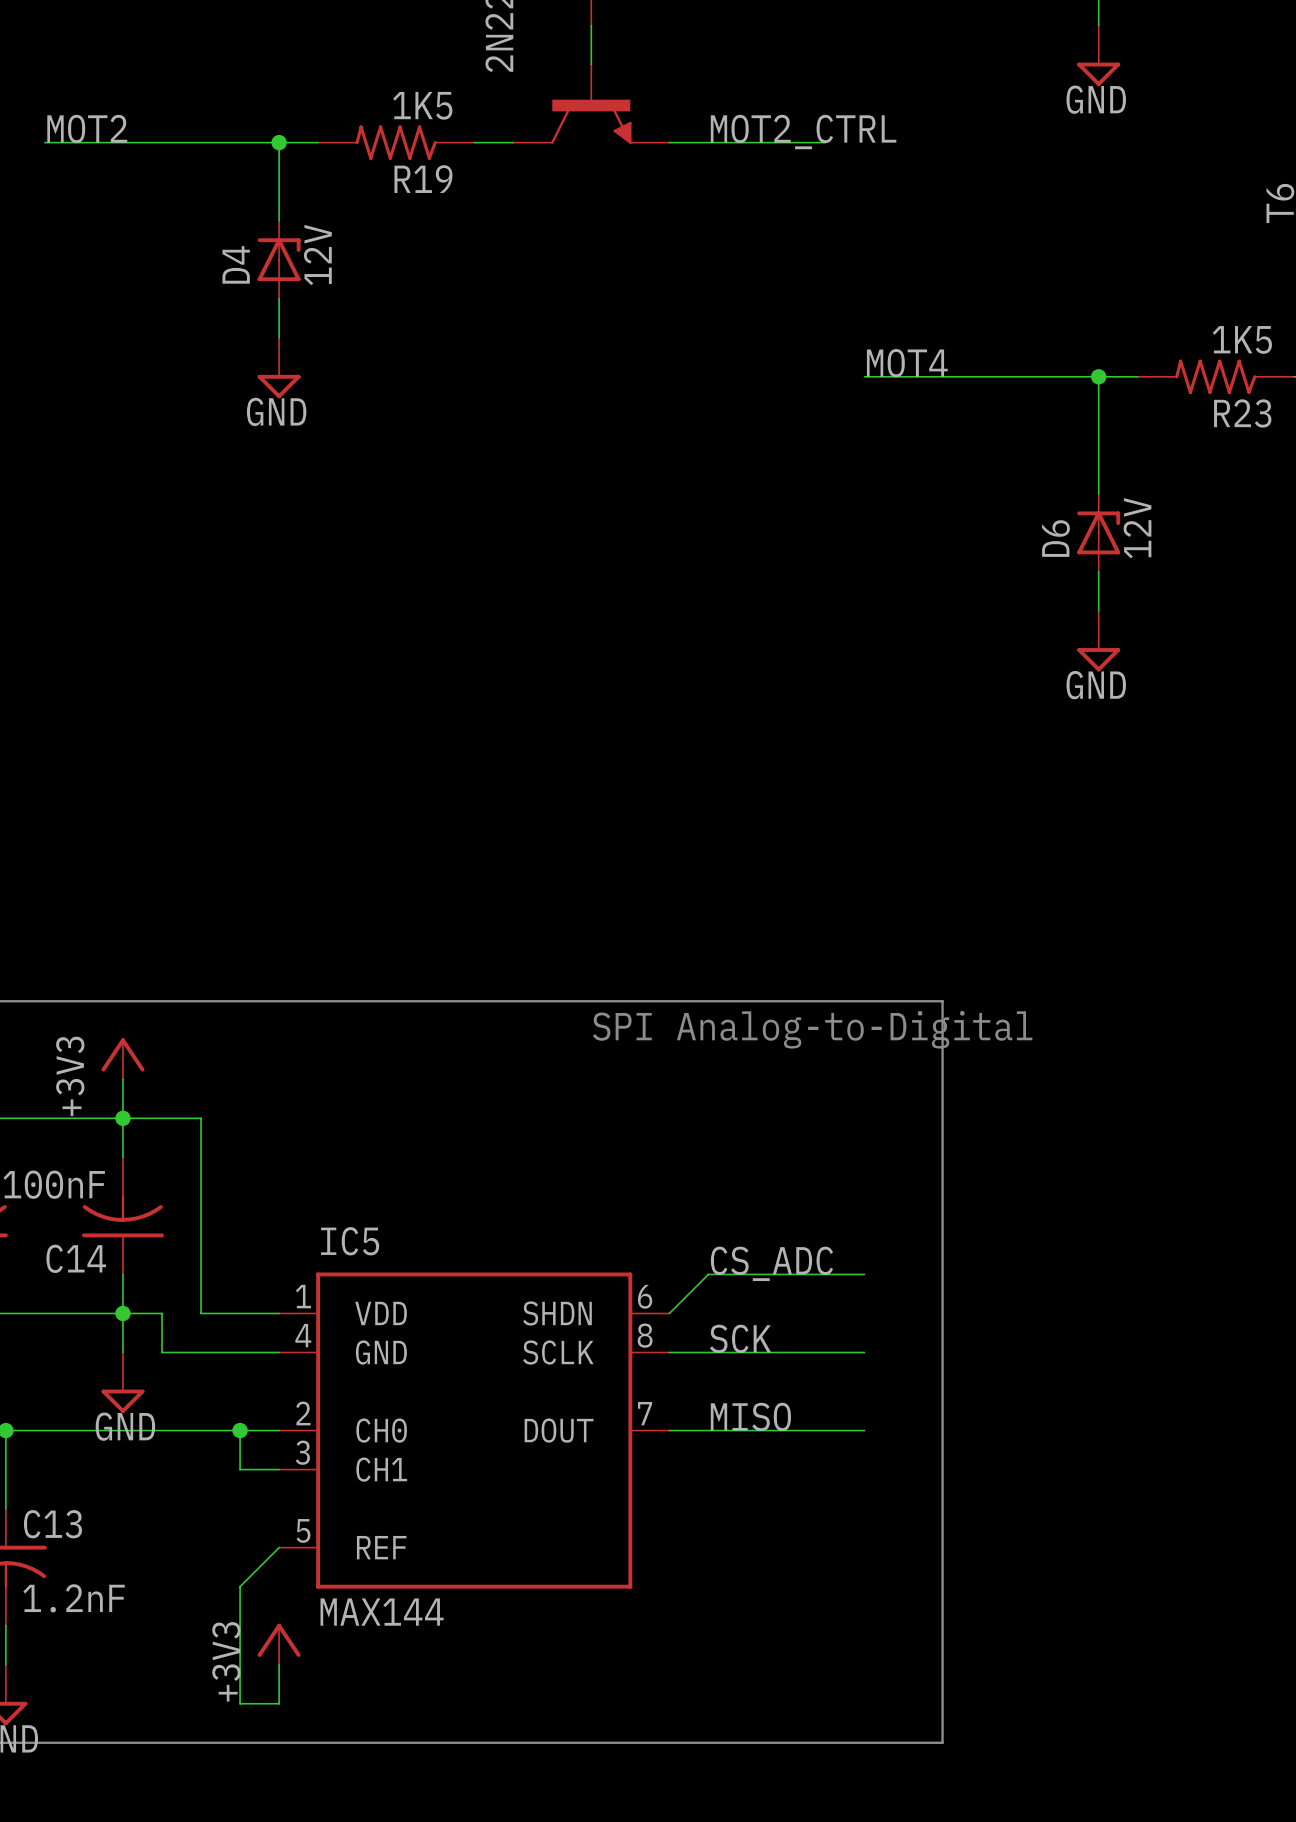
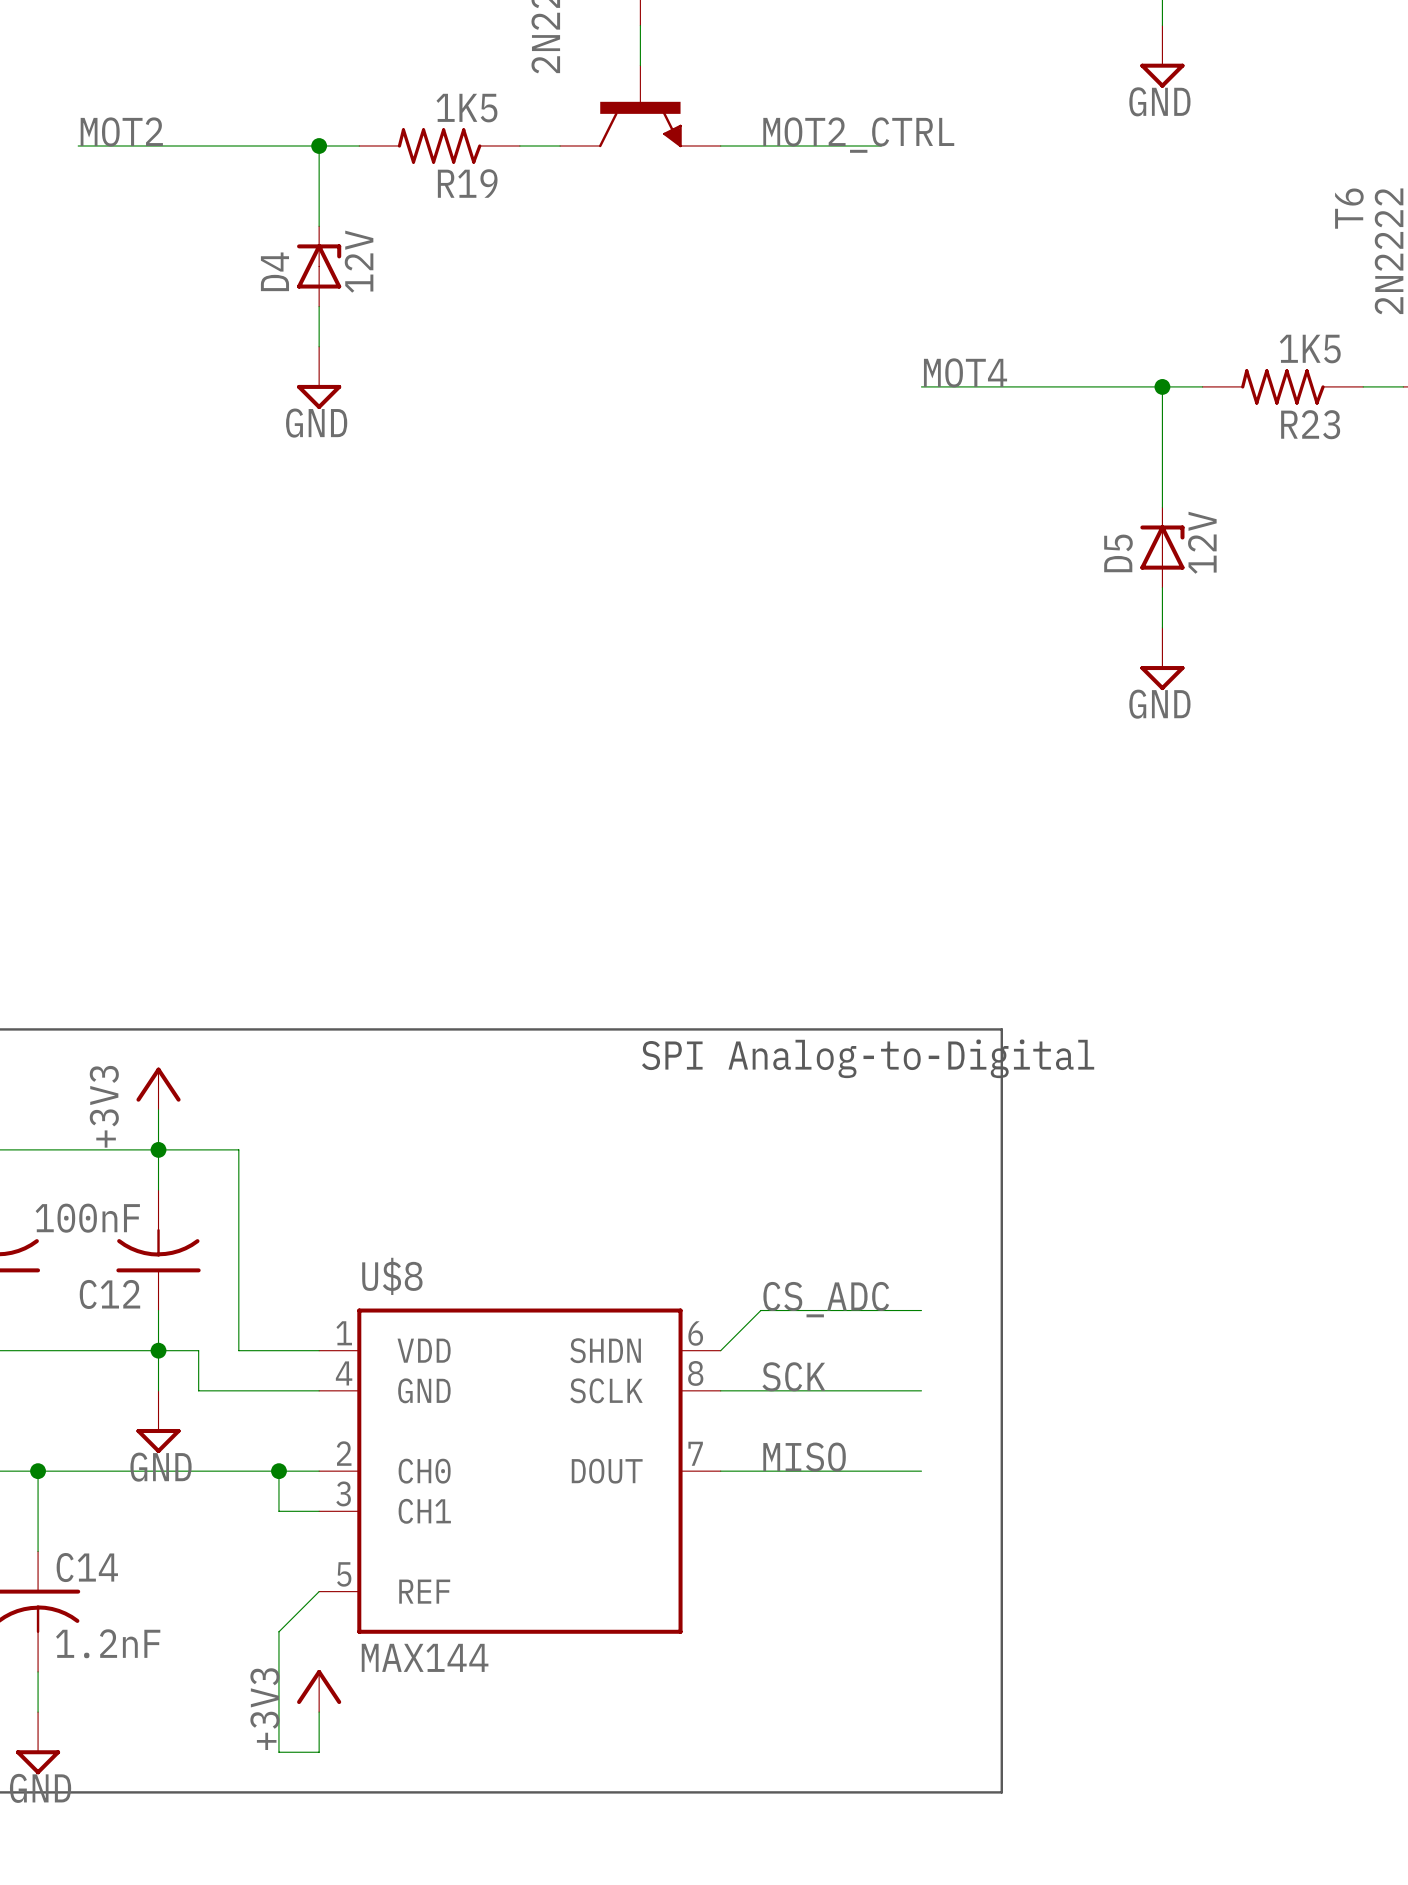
D6 name: D6 (1055, 538) -> D5 (1118, 553)
IC5 name: IC5 (350, 1241) -> U$8 (392, 1276)
C14 name: C14 (76, 1258) -> C12 (109, 1294)
C13 name: C13 (52, 1524) -> C14 (87, 1567)

